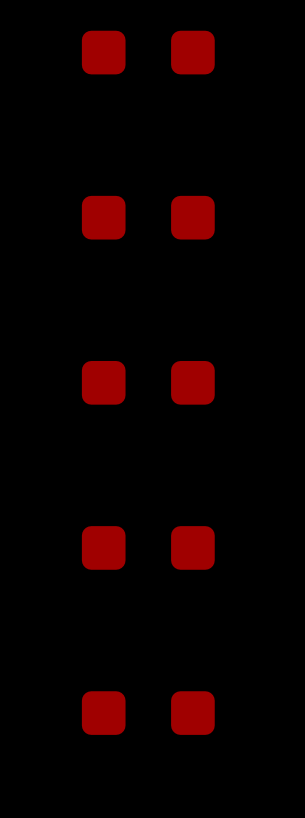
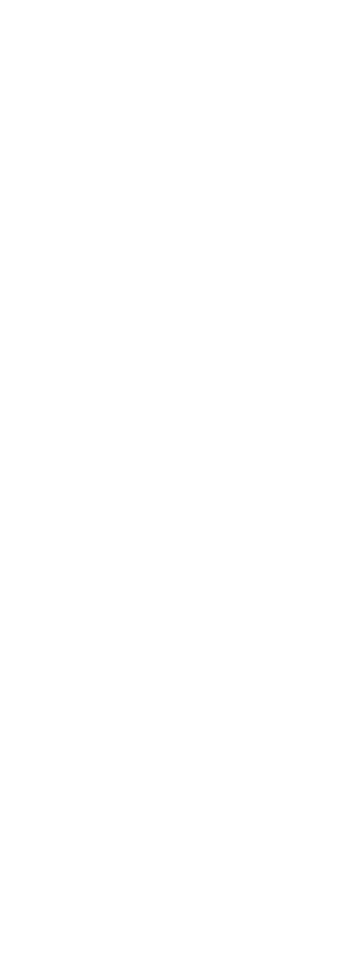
part: (148, 52) -> none
part: (148, 217) -> none
part: (148, 382) -> none
part: (148, 547) -> none
part: (148, 713) -> none

